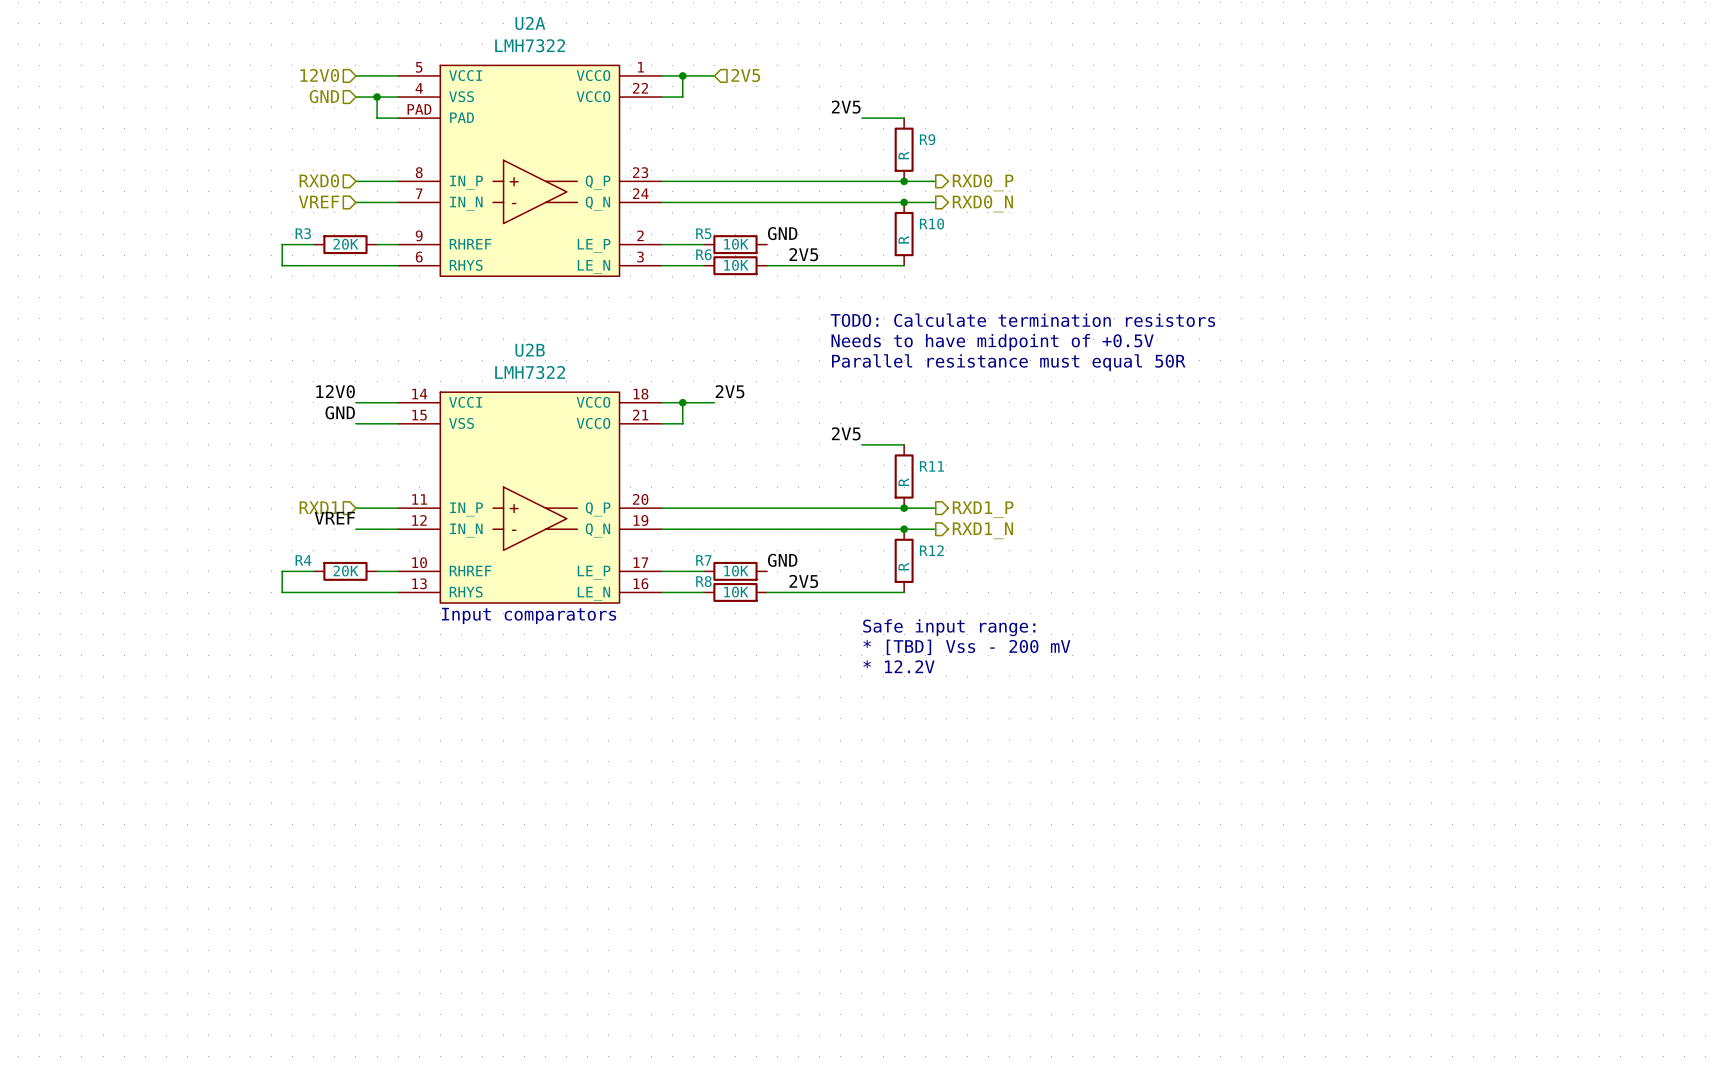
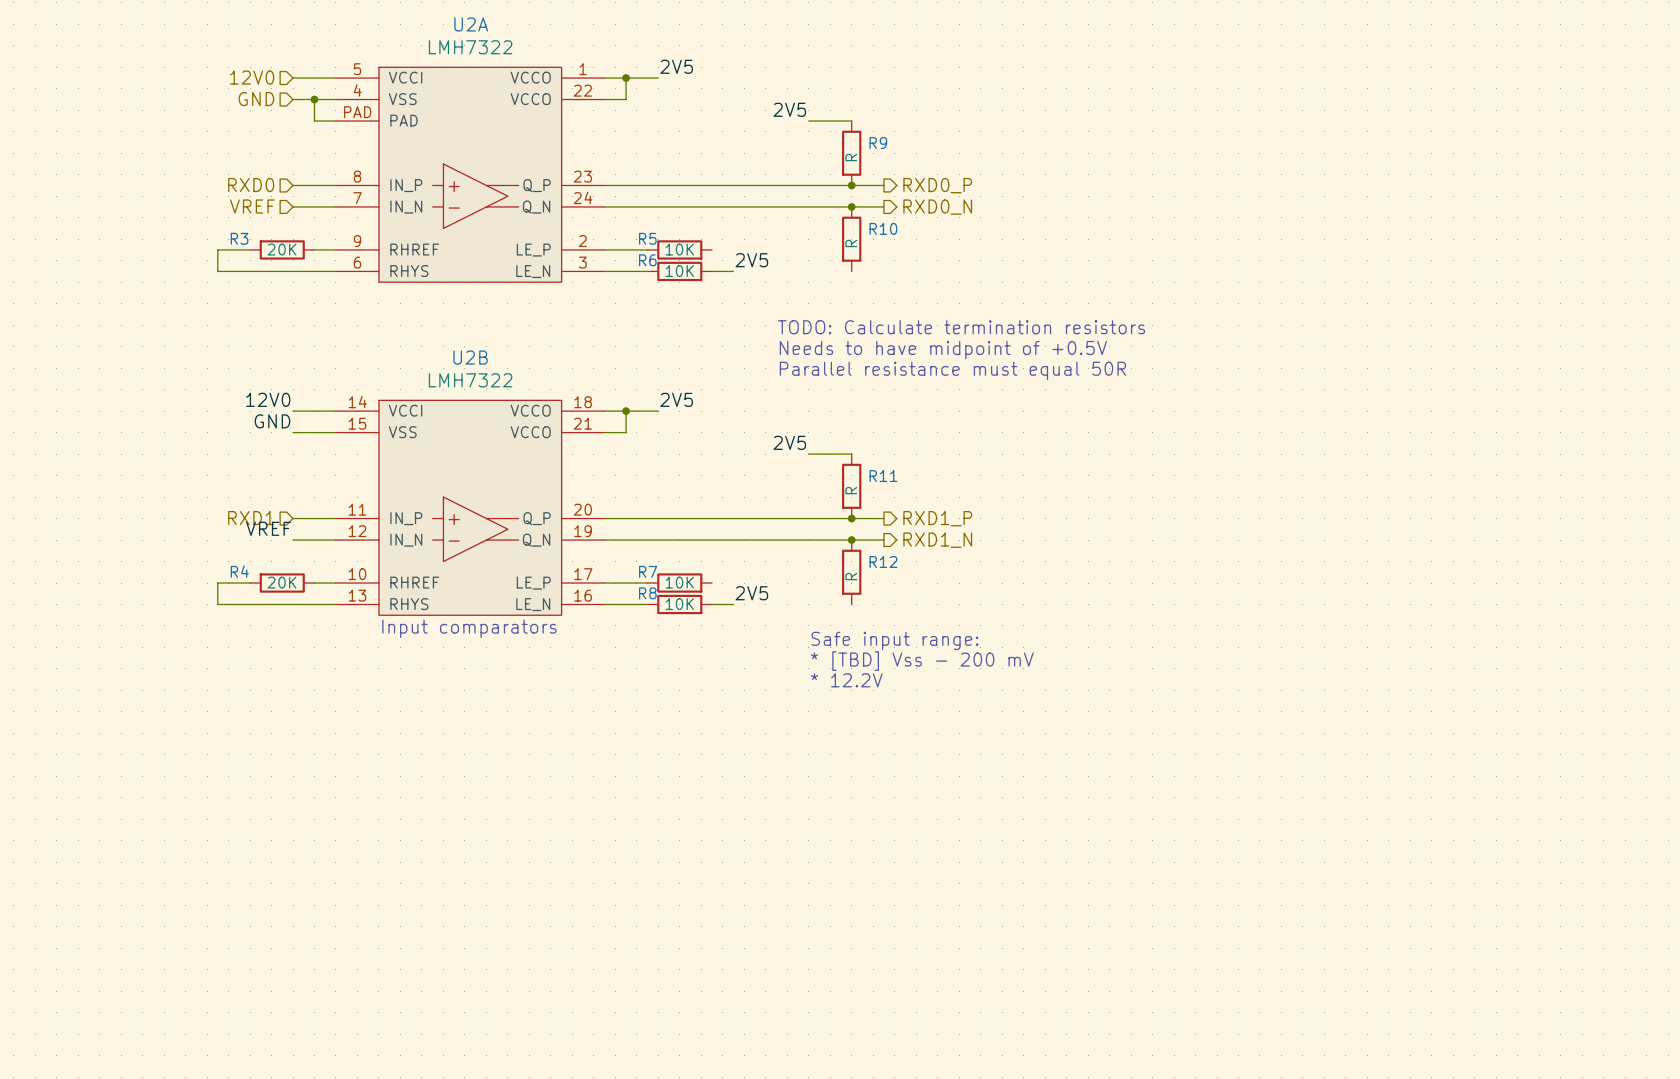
label: none -> 2V5 (676, 66)
hierarchical label: 2V5 (745, 75) -> none
label: GND (782, 233) -> none
wire: (788, 265) (904, 265) -> none
label: GND (782, 560) -> none
wire: (788, 592) (904, 592) -> none

